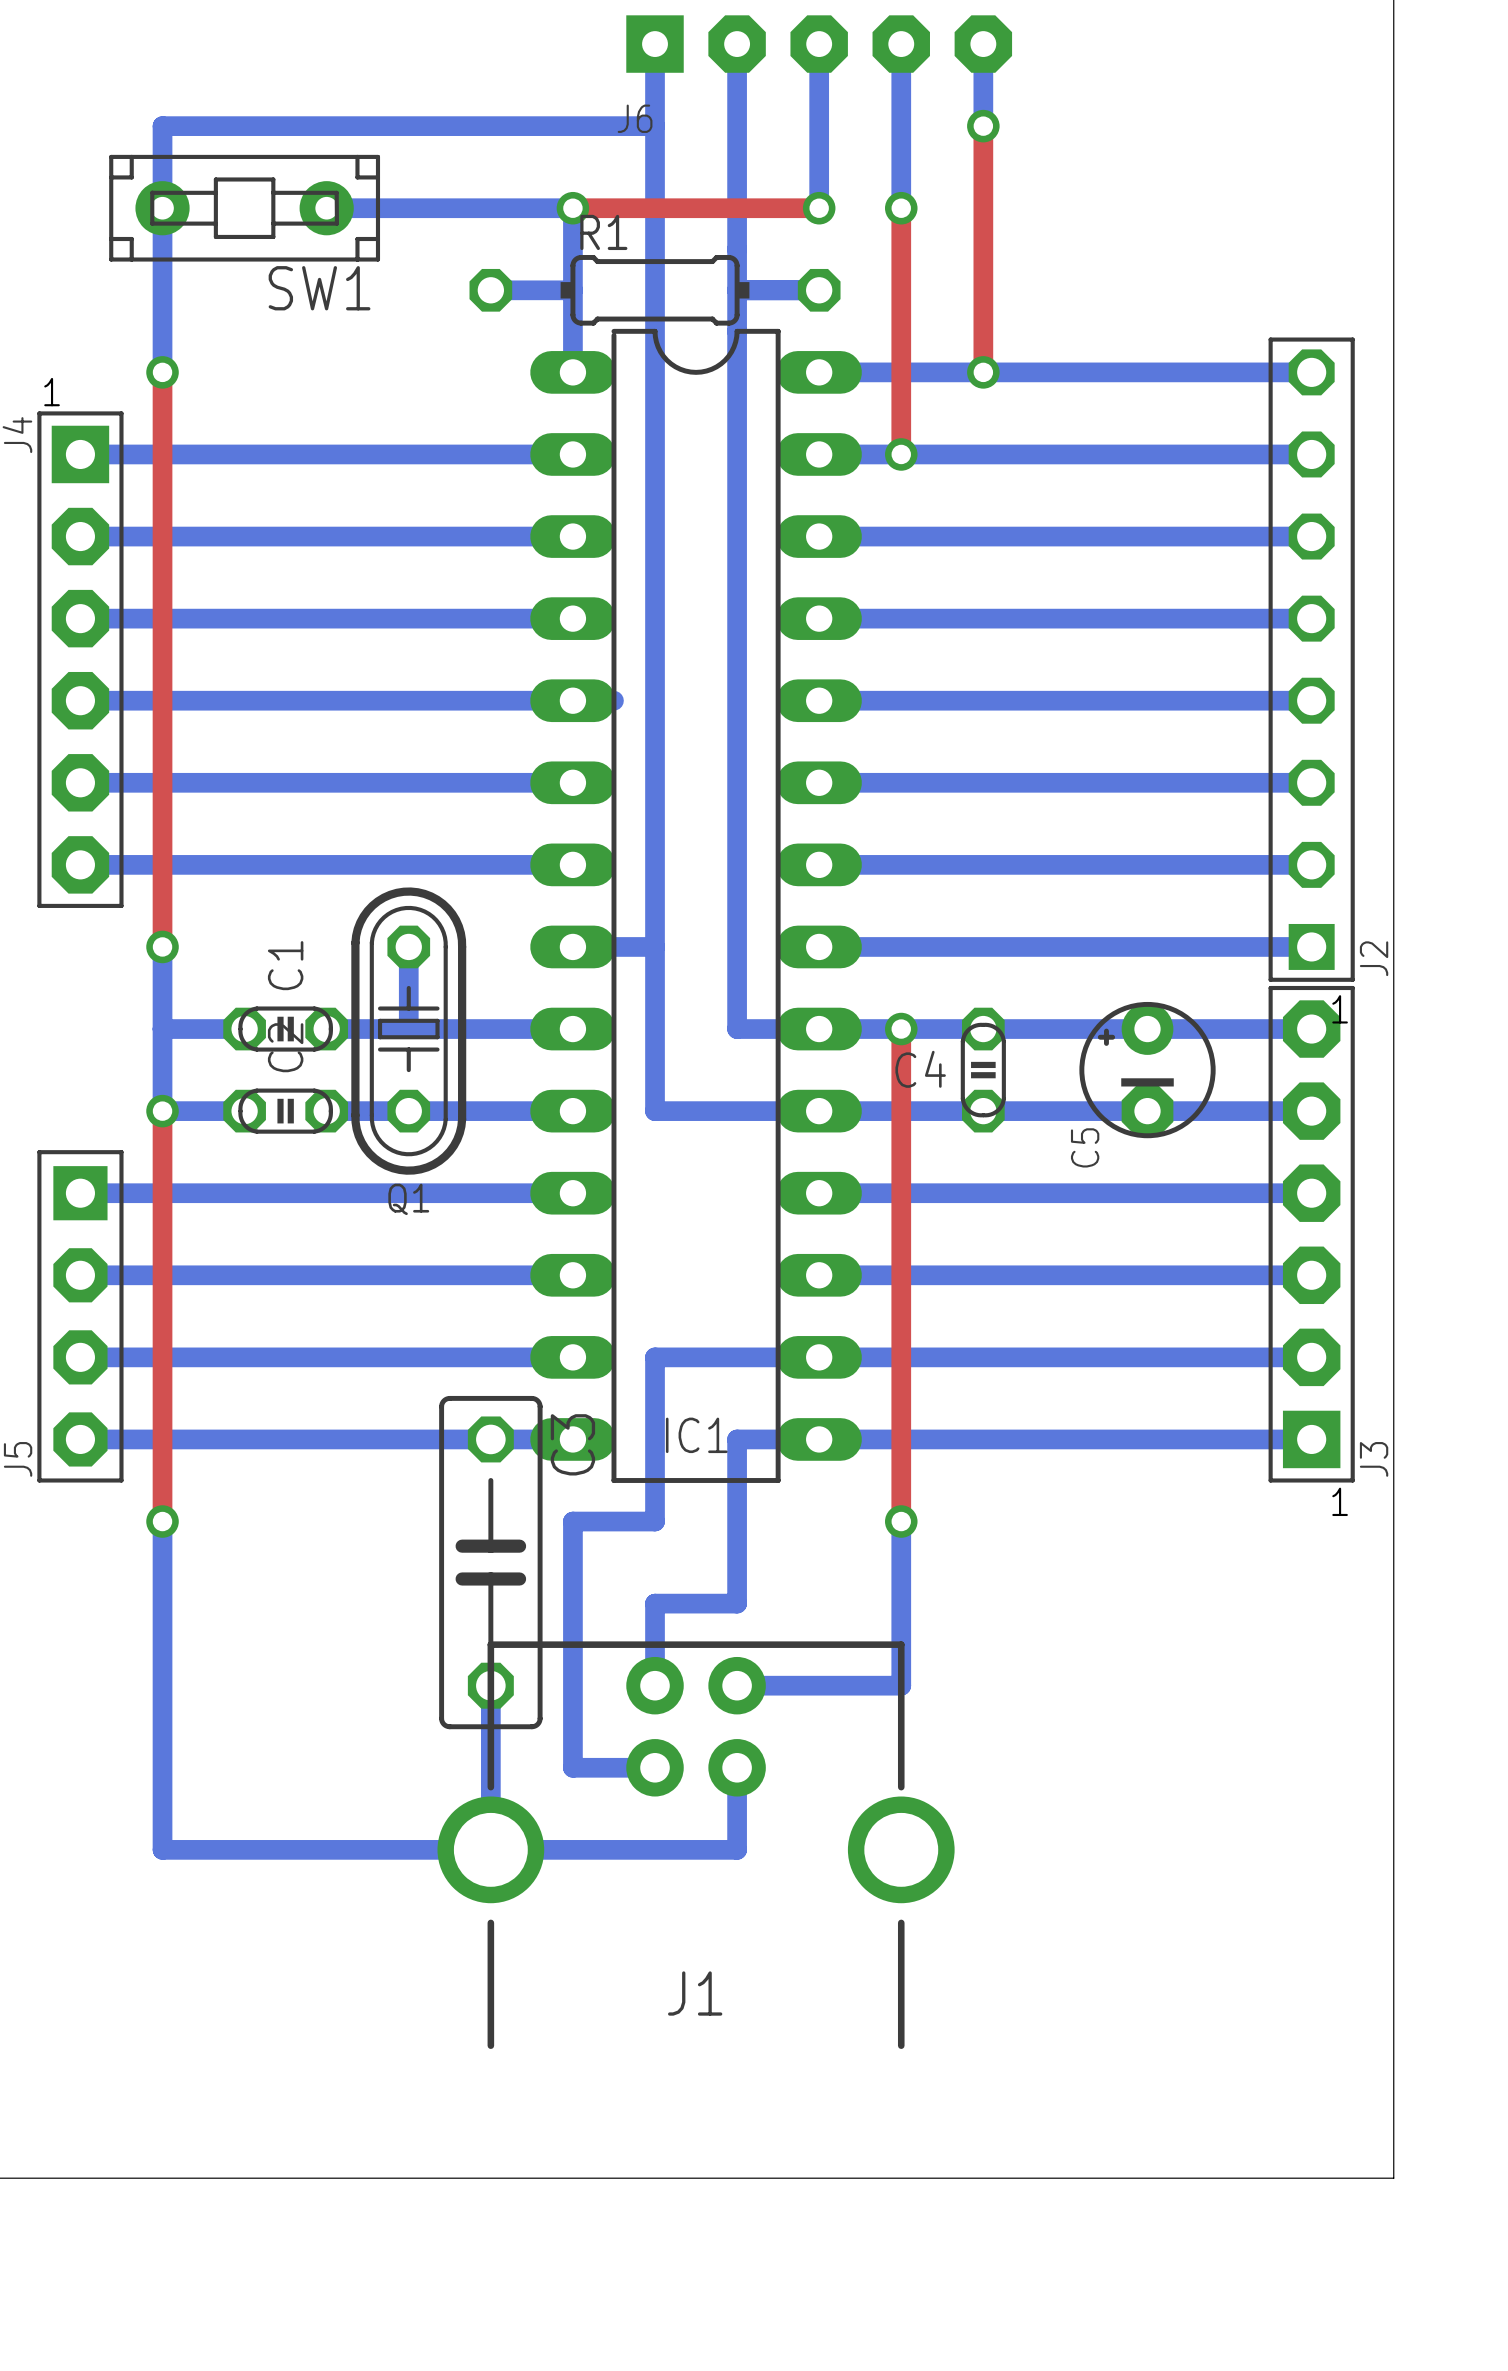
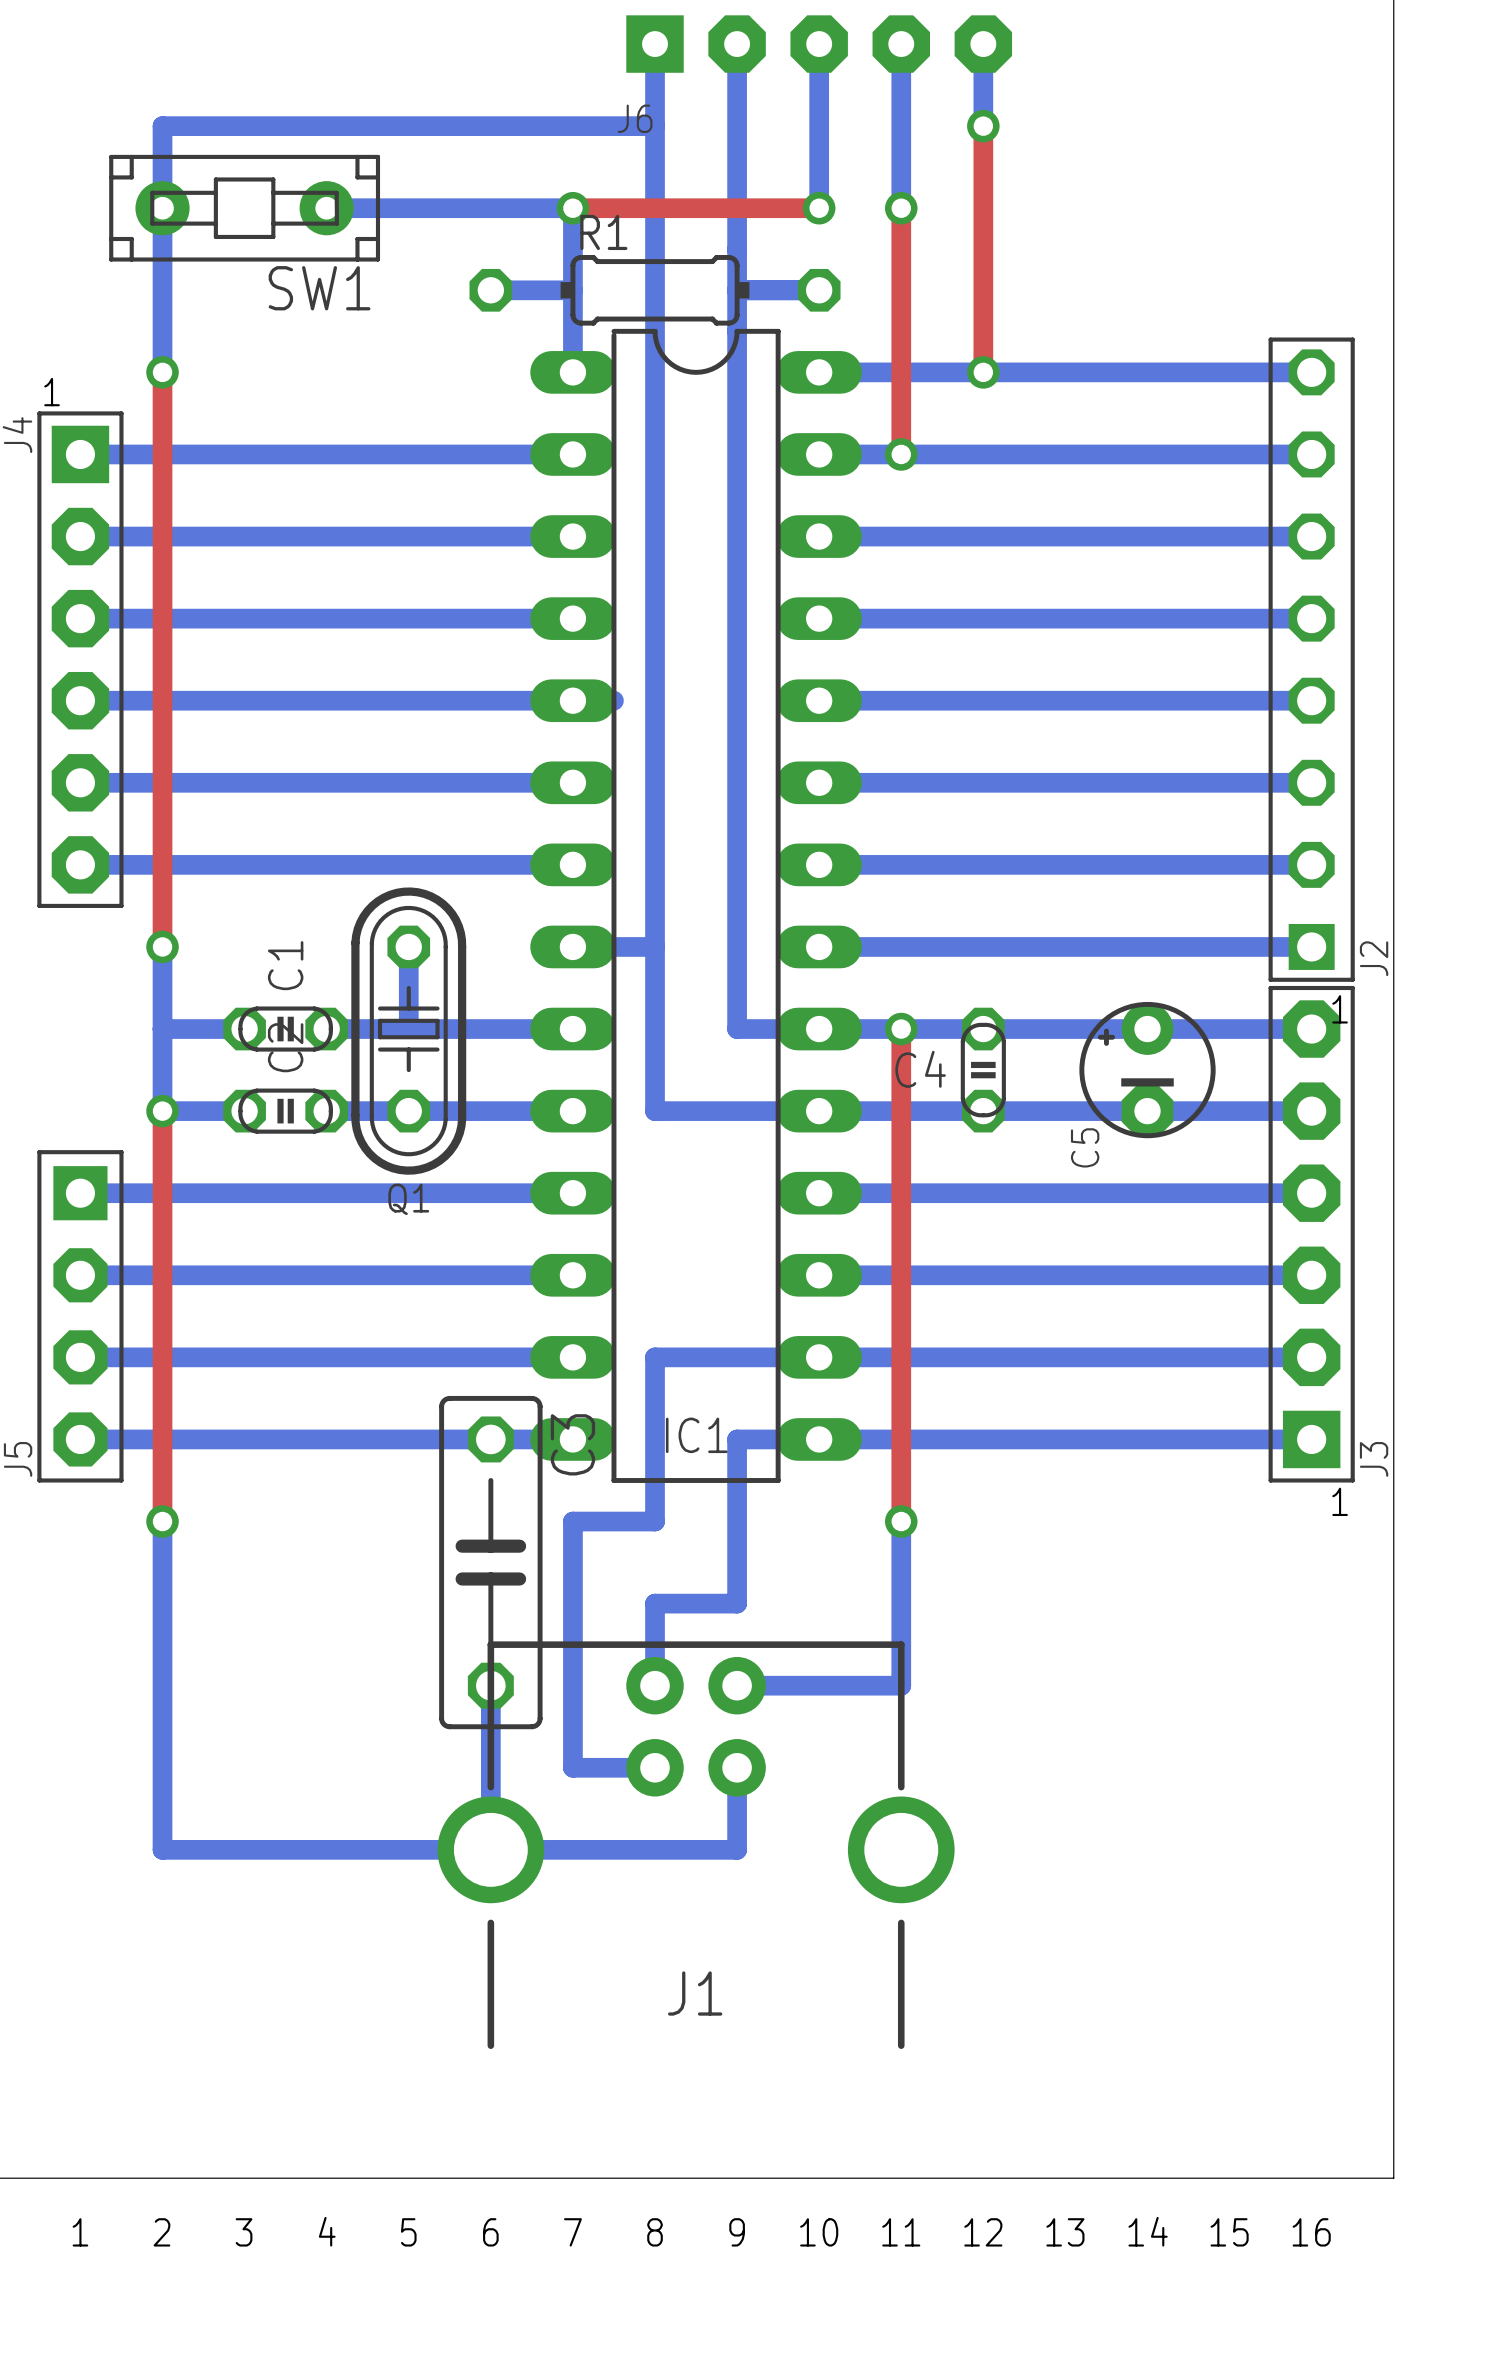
text: none -> 4 (327, 2231)
text: none -> 14 (1148, 2231)
text: none -> 1 (80, 2232)
text: none -> 2 (161, 2232)
text: none -> 3 (244, 2232)
text: none -> 5 (408, 2232)
text: none -> 6 (490, 2232)
text: none -> 7 (572, 2232)
text: none -> 8 (655, 2232)
text: none -> 9 (737, 2232)
text: none -> 10 (819, 2232)
text: none -> 11 (901, 2232)
text: none -> 12 (983, 2232)
text: none -> 13 (1065, 2232)
text: none -> 15 (1229, 2232)
text: none -> 16 (1311, 2232)

